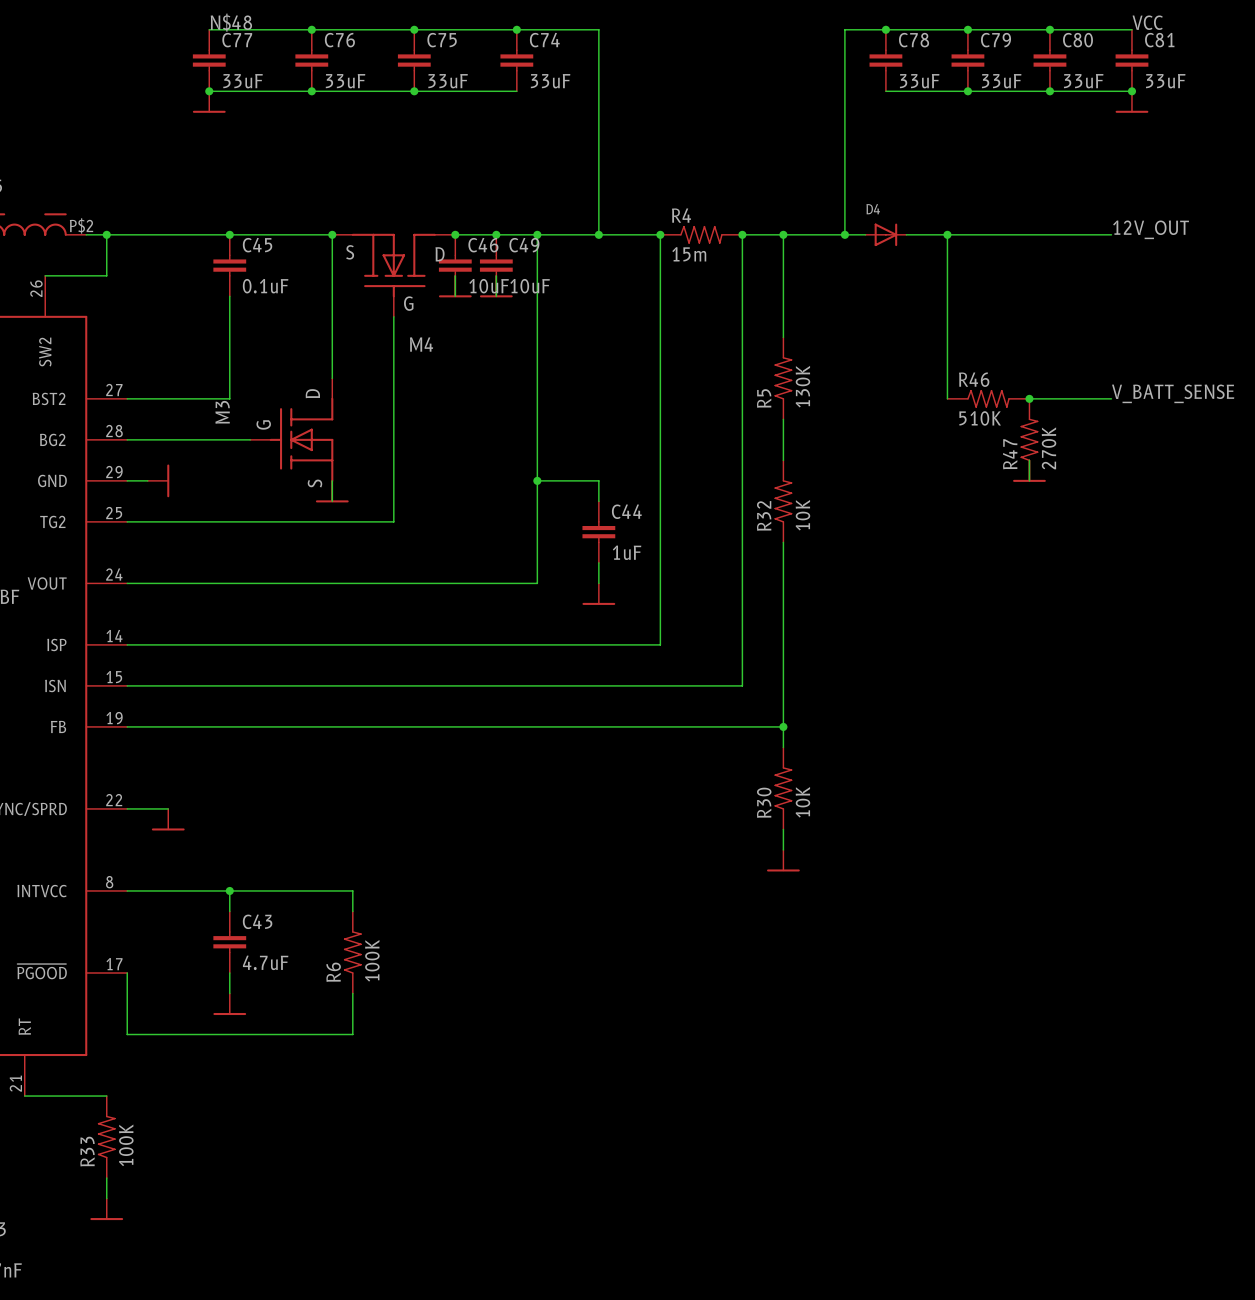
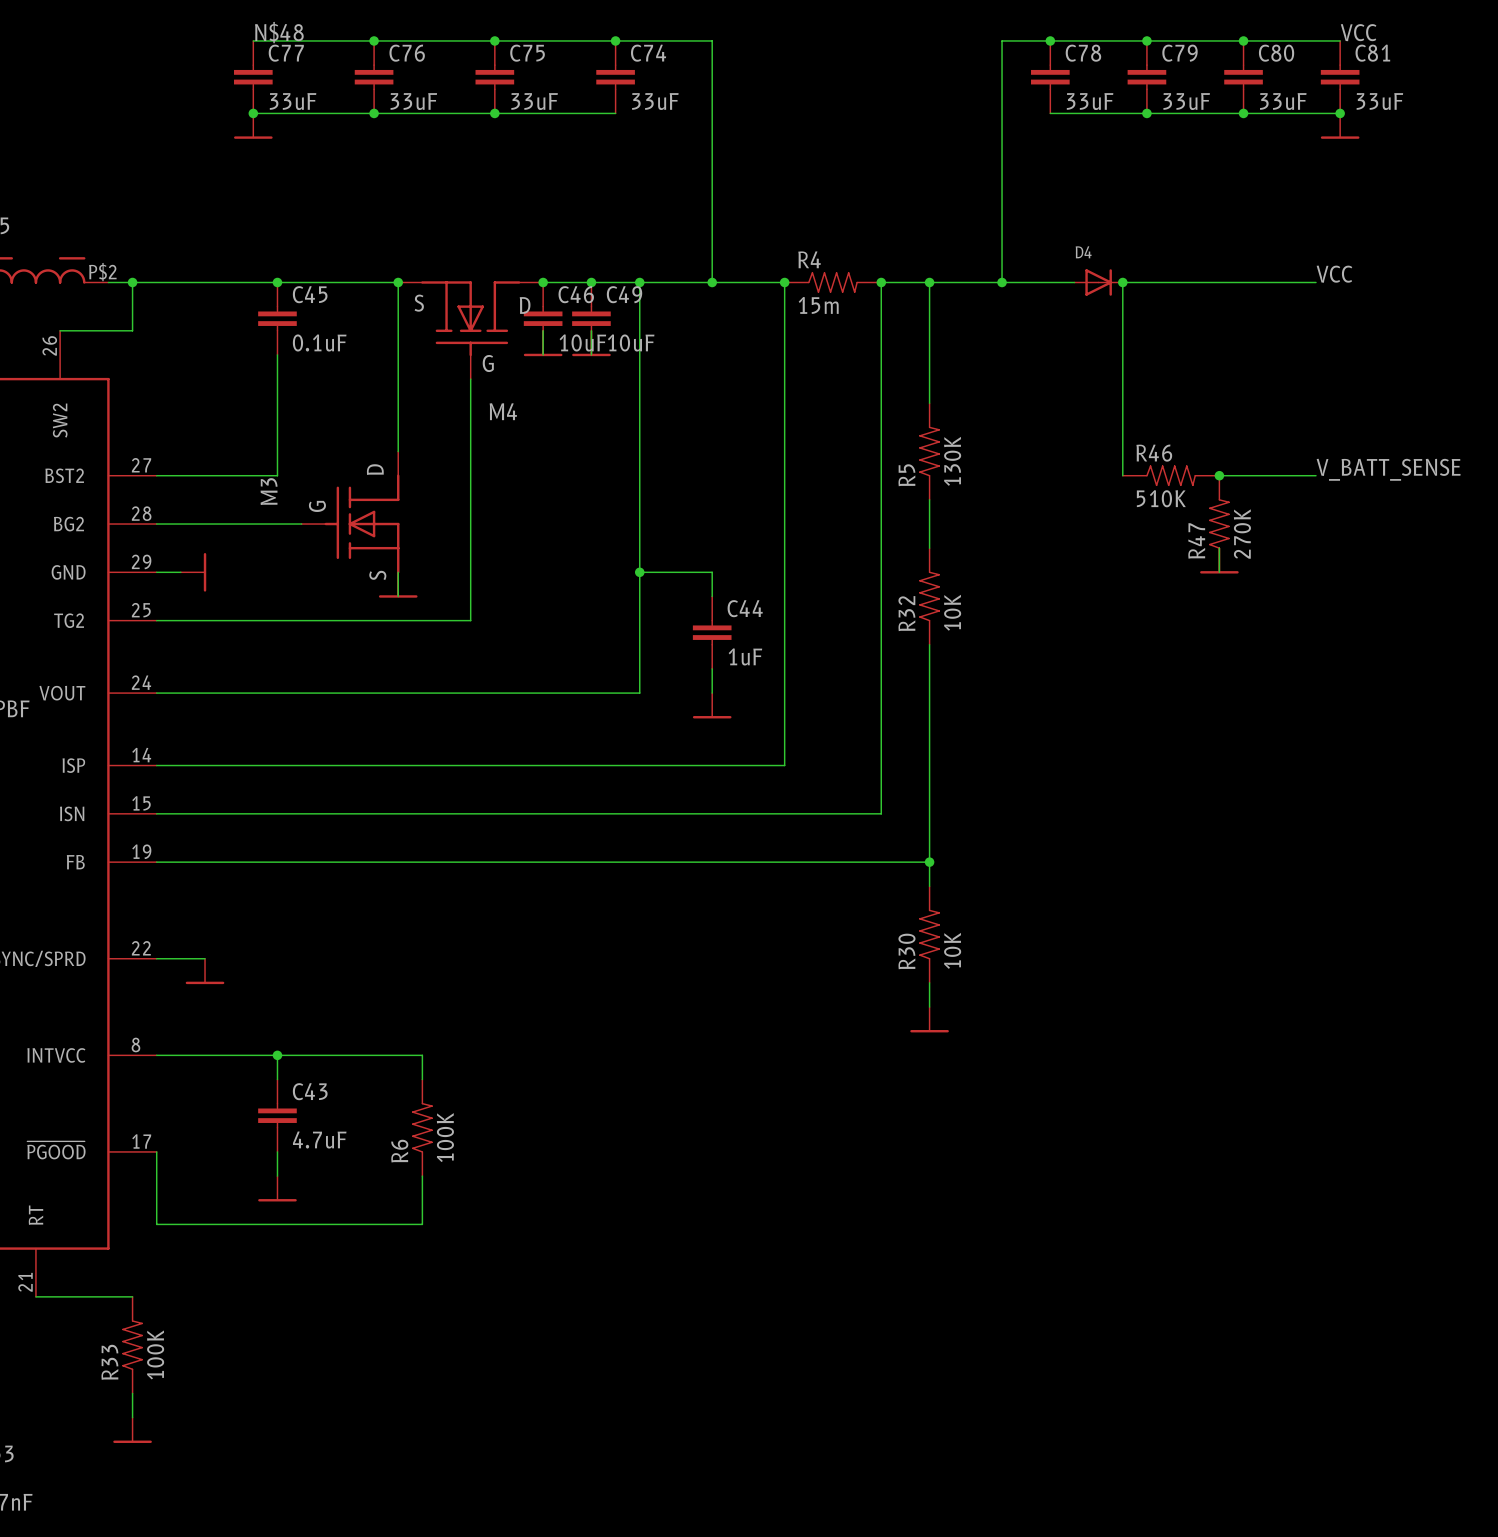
label: 12V_OUT (1151, 229) -> VCC (1334, 274)
D4 position: (885, 234) -> (1098, 282)

